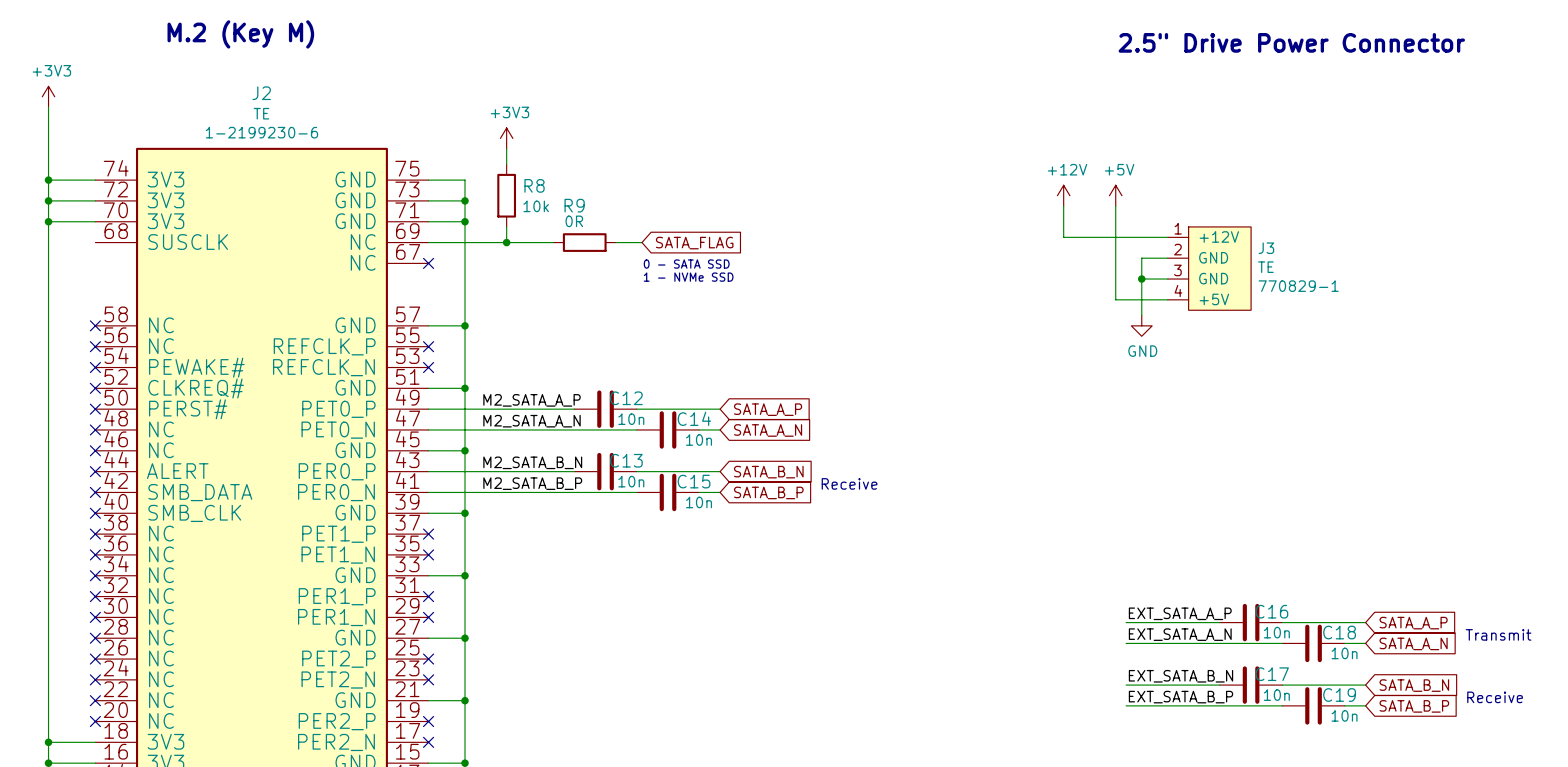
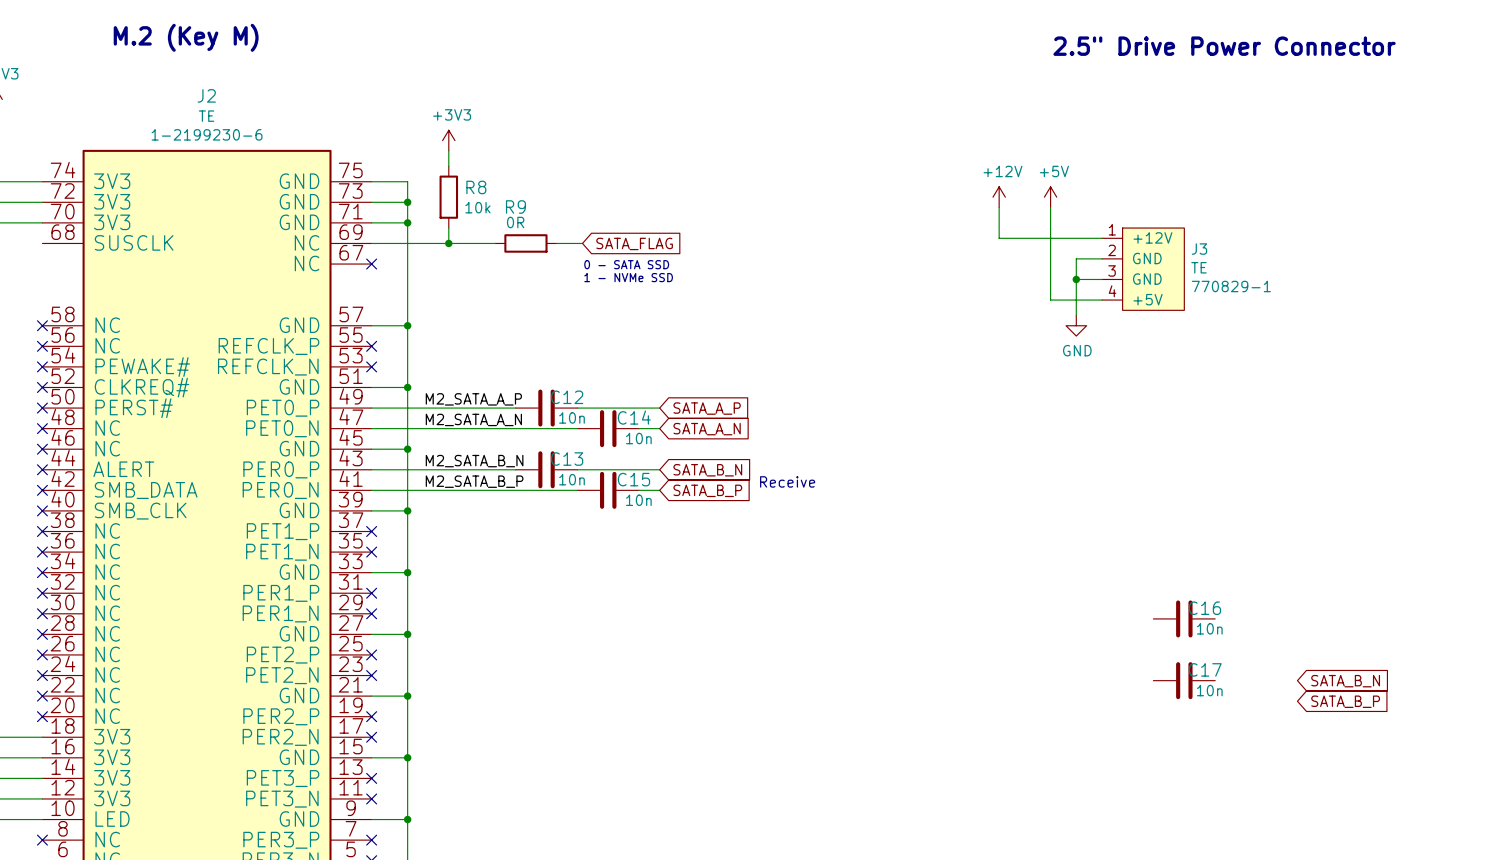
label: EXT_SATA_A_P (1180, 613) -> none
wire: (1126, 622) (1219, 622) -> none
wire: (1282, 622) (1365, 622) -> none
global label: SATA_A_P (1413, 623) -> none
label: EXT_SATA_A_N (1180, 634) -> none
text: Transmit (1498, 634) -> none
wire: (1126, 643) (1282, 643) -> none
C18: (1313, 643) -> none
wire: (1344, 643) (1365, 643) -> none
global label: SATA_A_N (1413, 643) -> none
label: EXT_SATA_B_N (1181, 676) -> none
wire: (1126, 685) (1219, 685) -> none
wire: (1282, 685) (1365, 685) -> none
label: EXT_SATA_B_P (1181, 697) -> none
text: Receive (1495, 697) -> none
wire: (1126, 705) (1282, 705) -> none
C19: (1313, 705) -> none
wire: (1344, 705) (1365, 705) -> none

